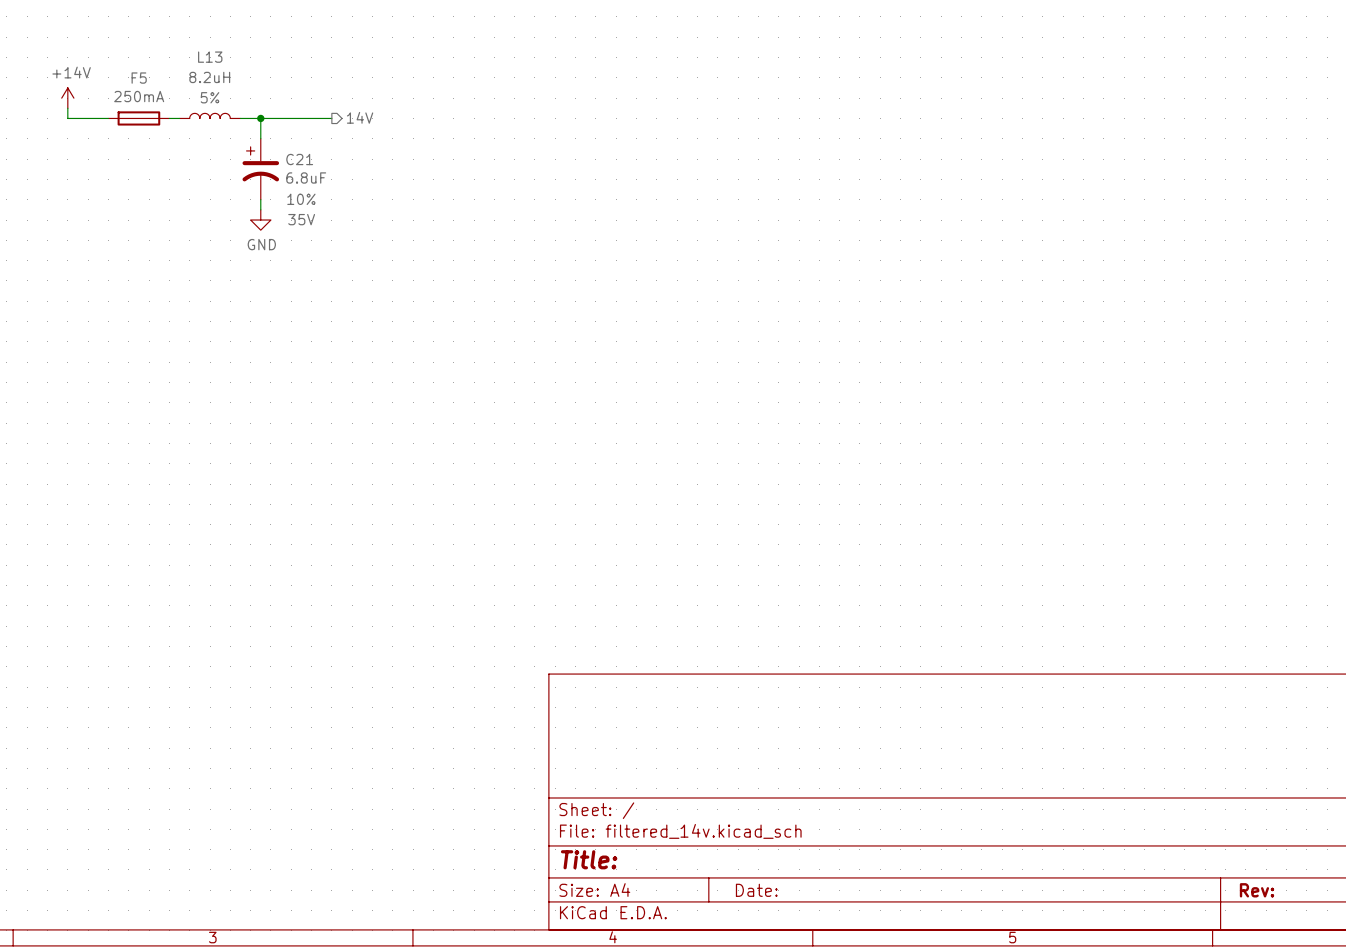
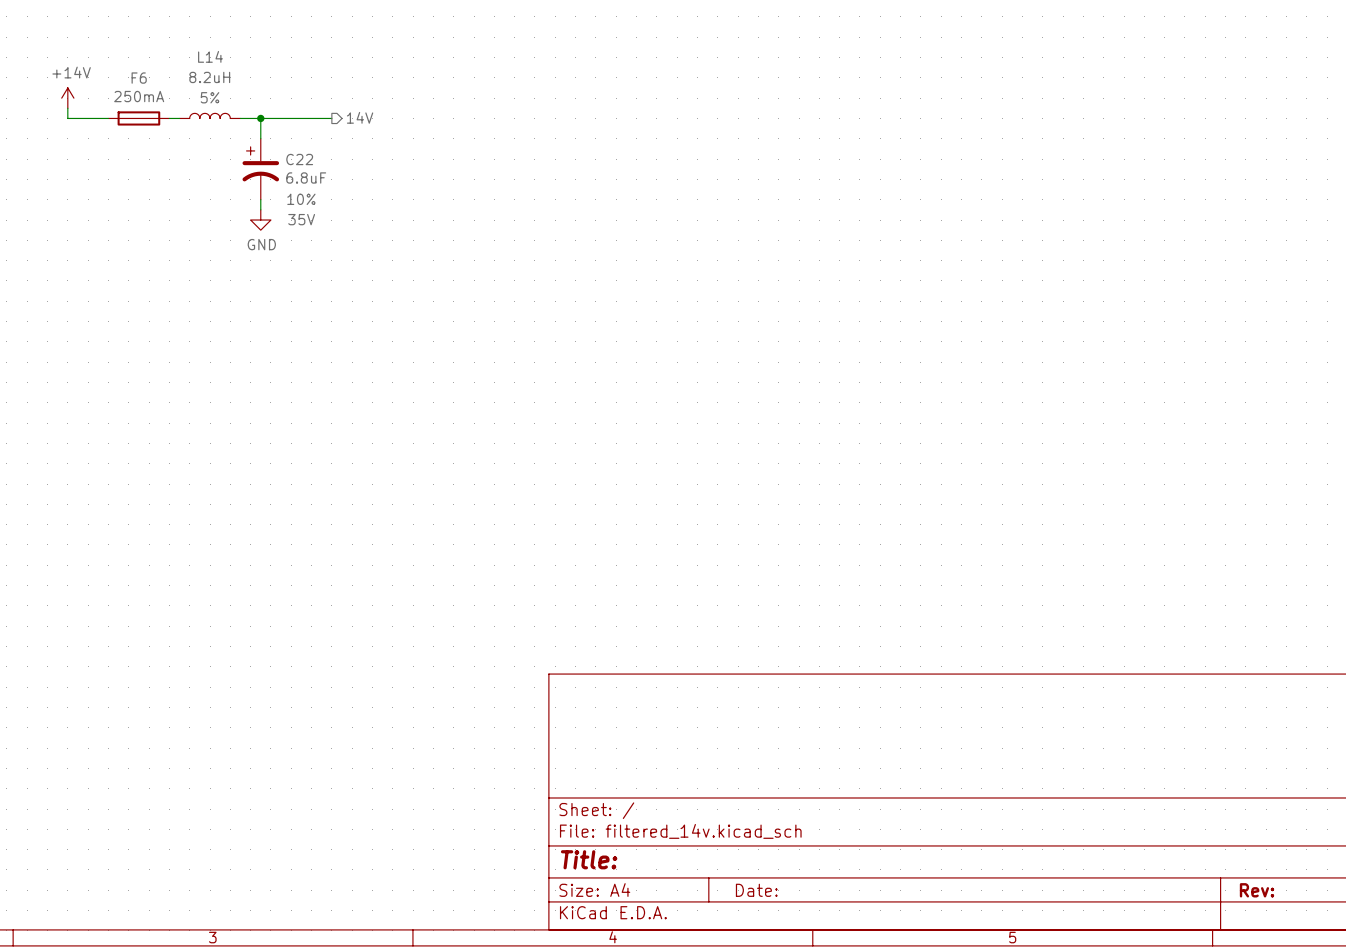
L13 name: L13 (210, 57) -> L14 (210, 56)
F5 name: F5 (139, 78) -> F6 (139, 78)
C21 name: C21 (299, 159) -> C22 (299, 159)

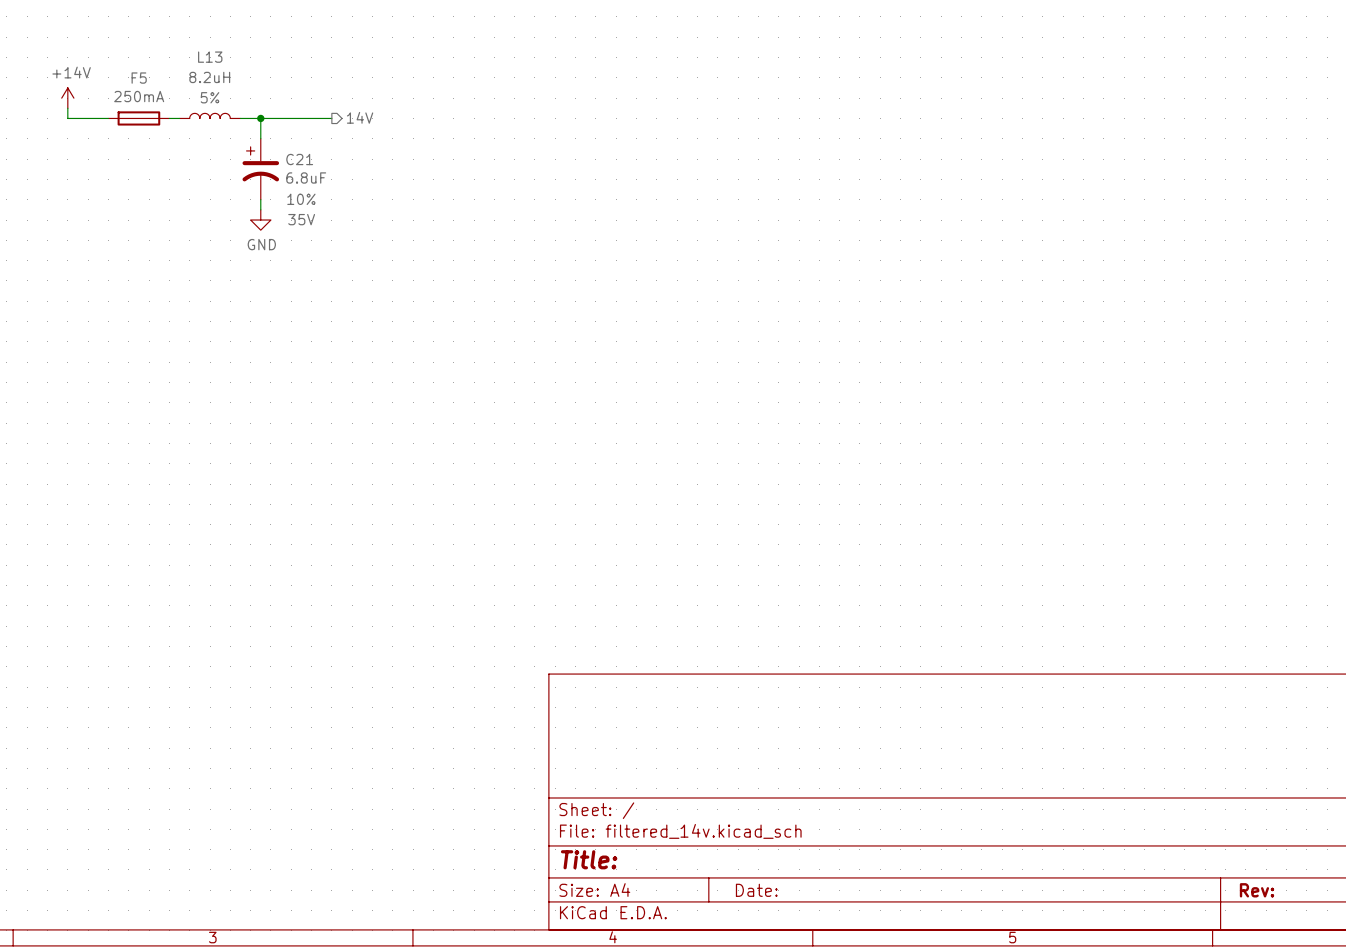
L14 name: L14 (210, 56) -> L13 (210, 57)
F6 name: F6 (139, 78) -> F5 (139, 78)
C22 name: C22 (299, 159) -> C21 (299, 159)

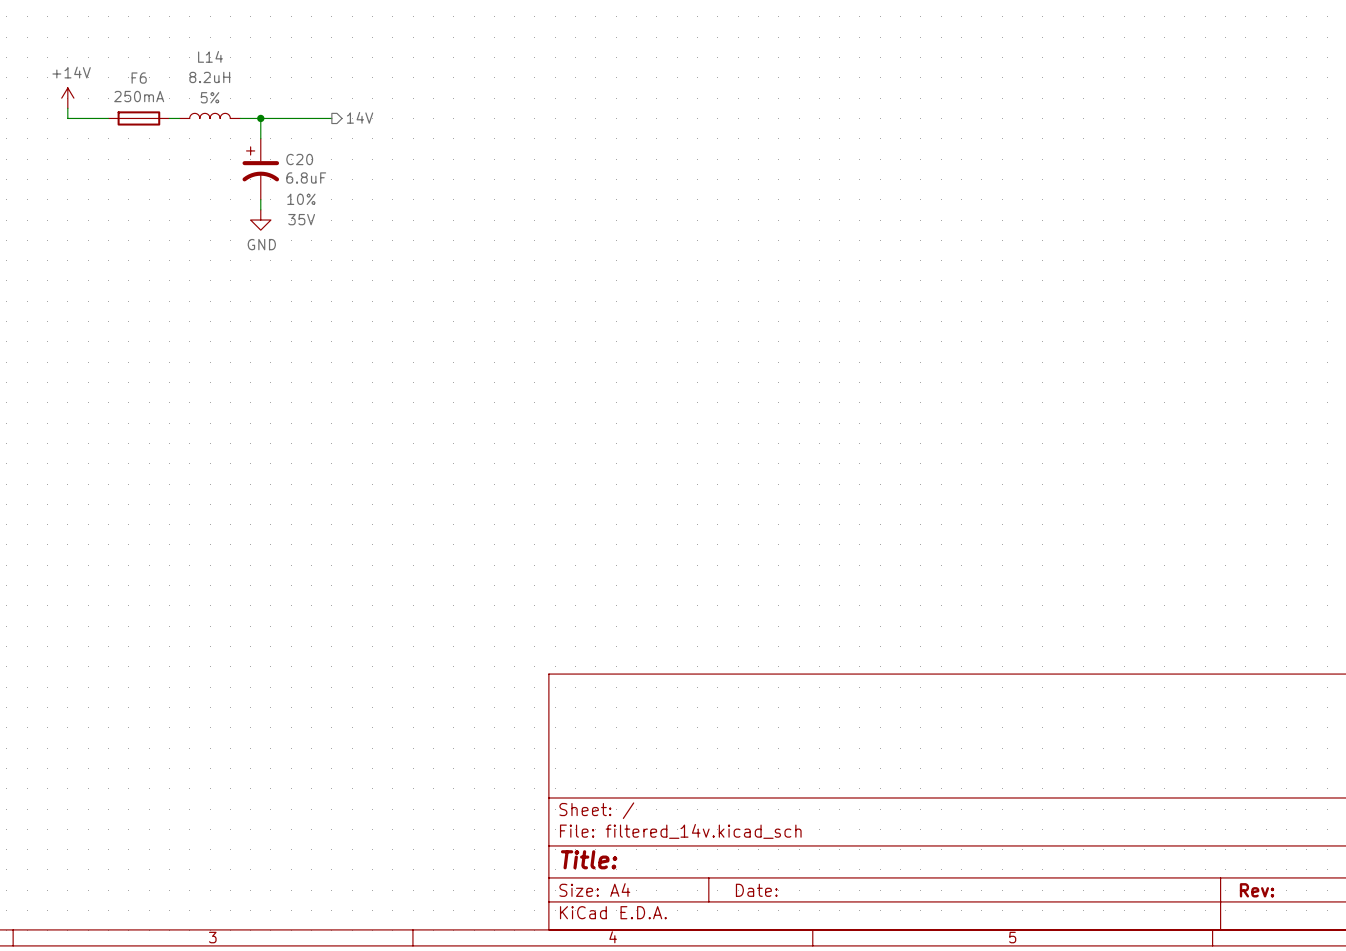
L13 name: L13 (210, 57) -> L14 (210, 56)
F5 name: F5 (139, 78) -> F6 (139, 78)
C21 name: C21 (299, 159) -> C20 (299, 159)

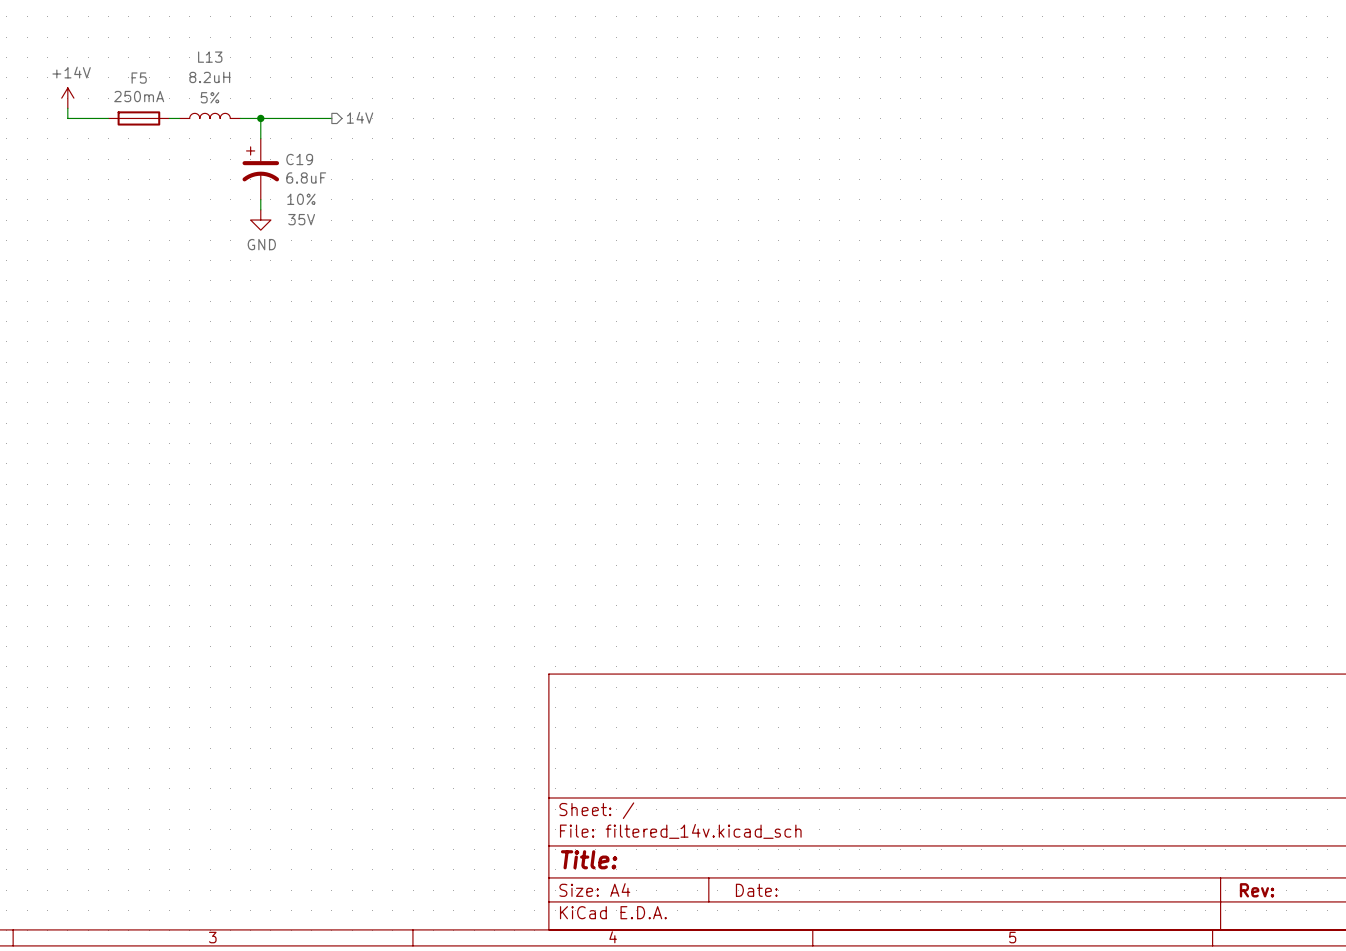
L14 name: L14 (210, 56) -> L13 (210, 57)
F6 name: F6 (139, 78) -> F5 (139, 78)
C20 name: C20 (299, 159) -> C19 (299, 159)

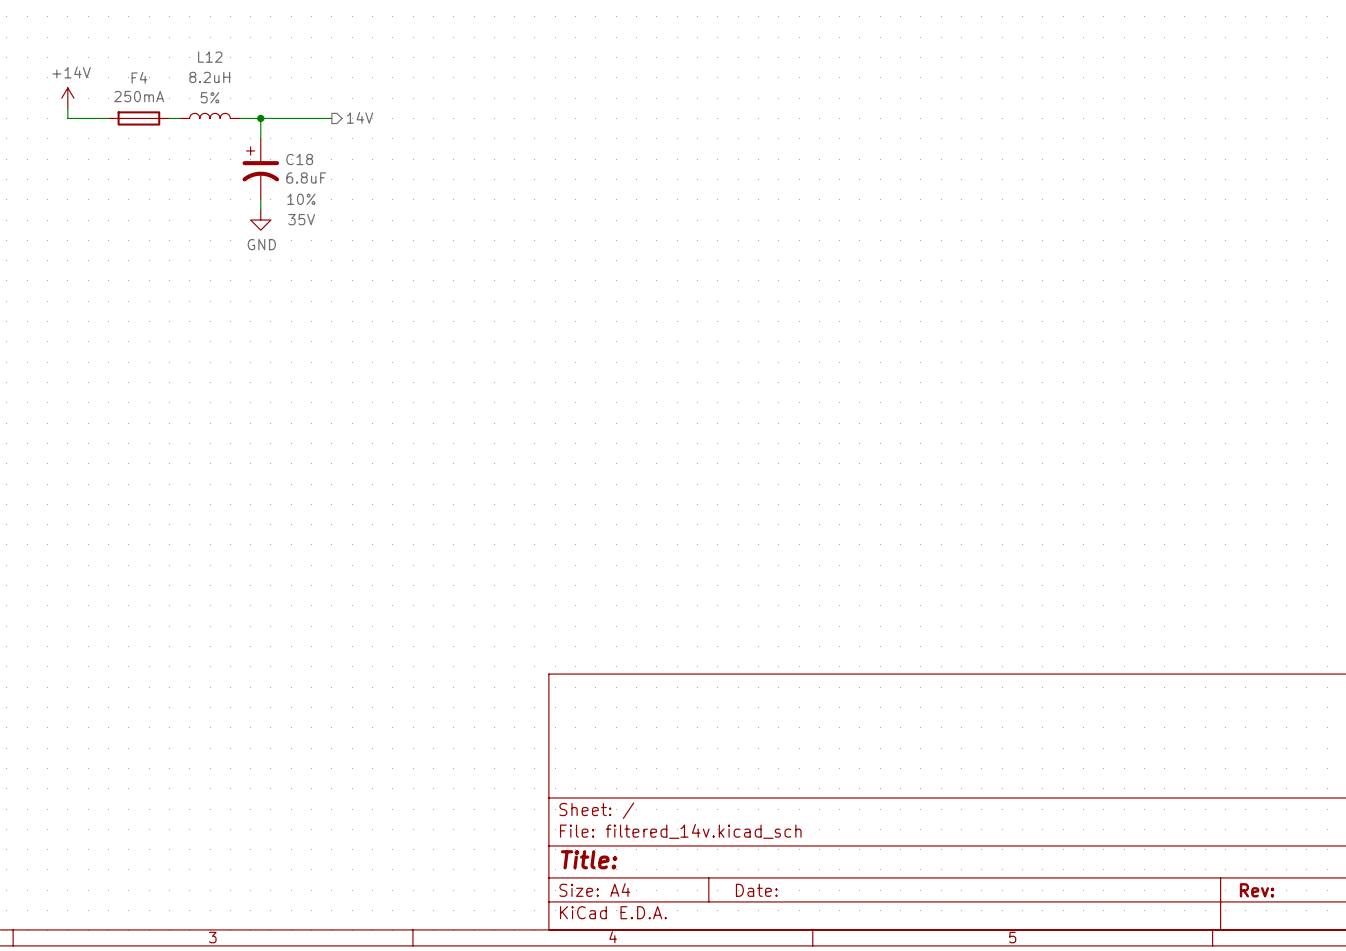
L13 name: L13 (210, 57) -> L12 (210, 57)
F5 name: F5 (139, 78) -> F4 (139, 77)
C19 name: C19 (299, 159) -> C18 (299, 159)

